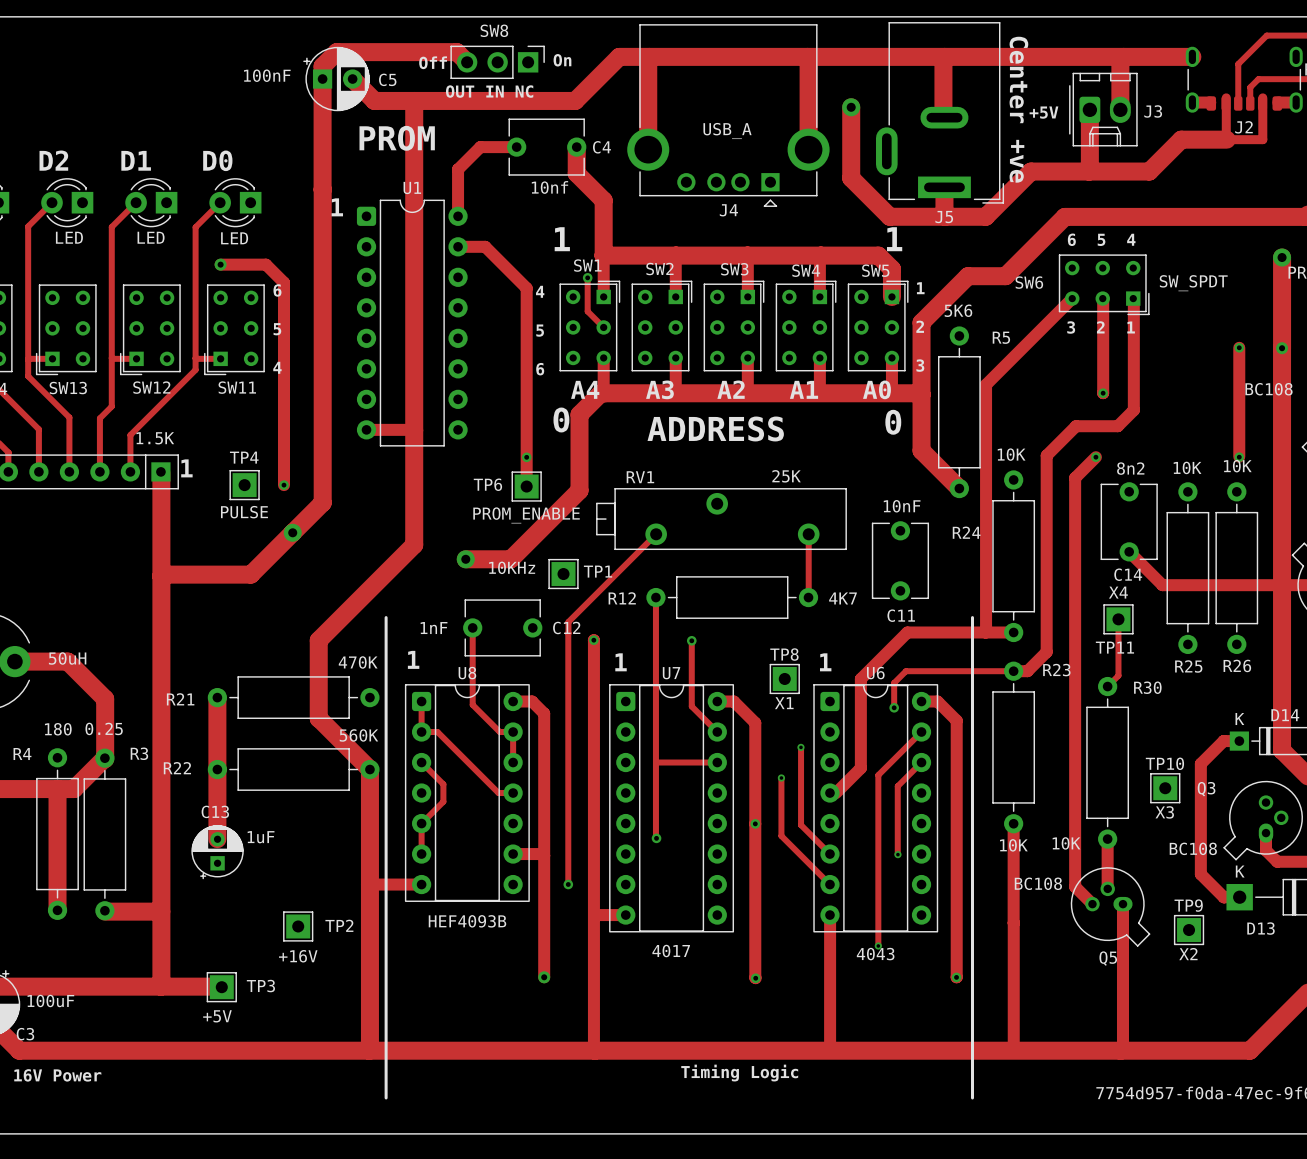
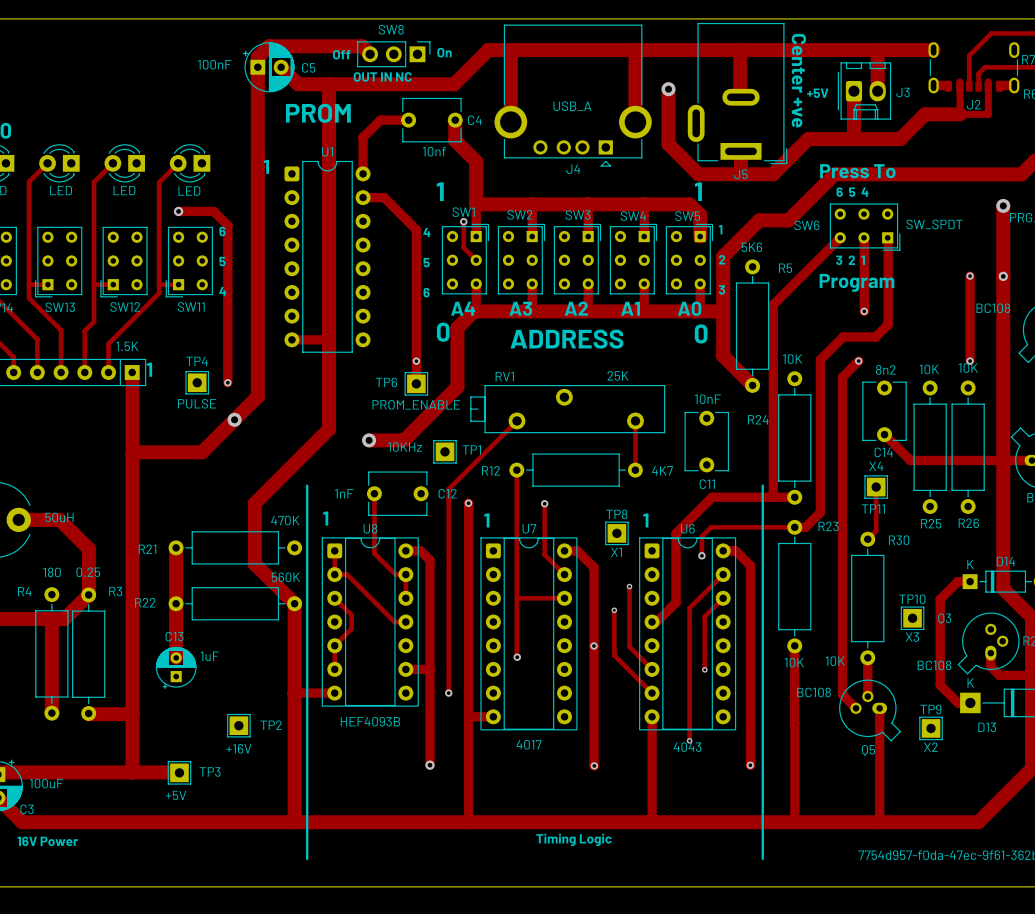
text: none -> Press To (857, 171)
text: none -> Program (856, 282)

